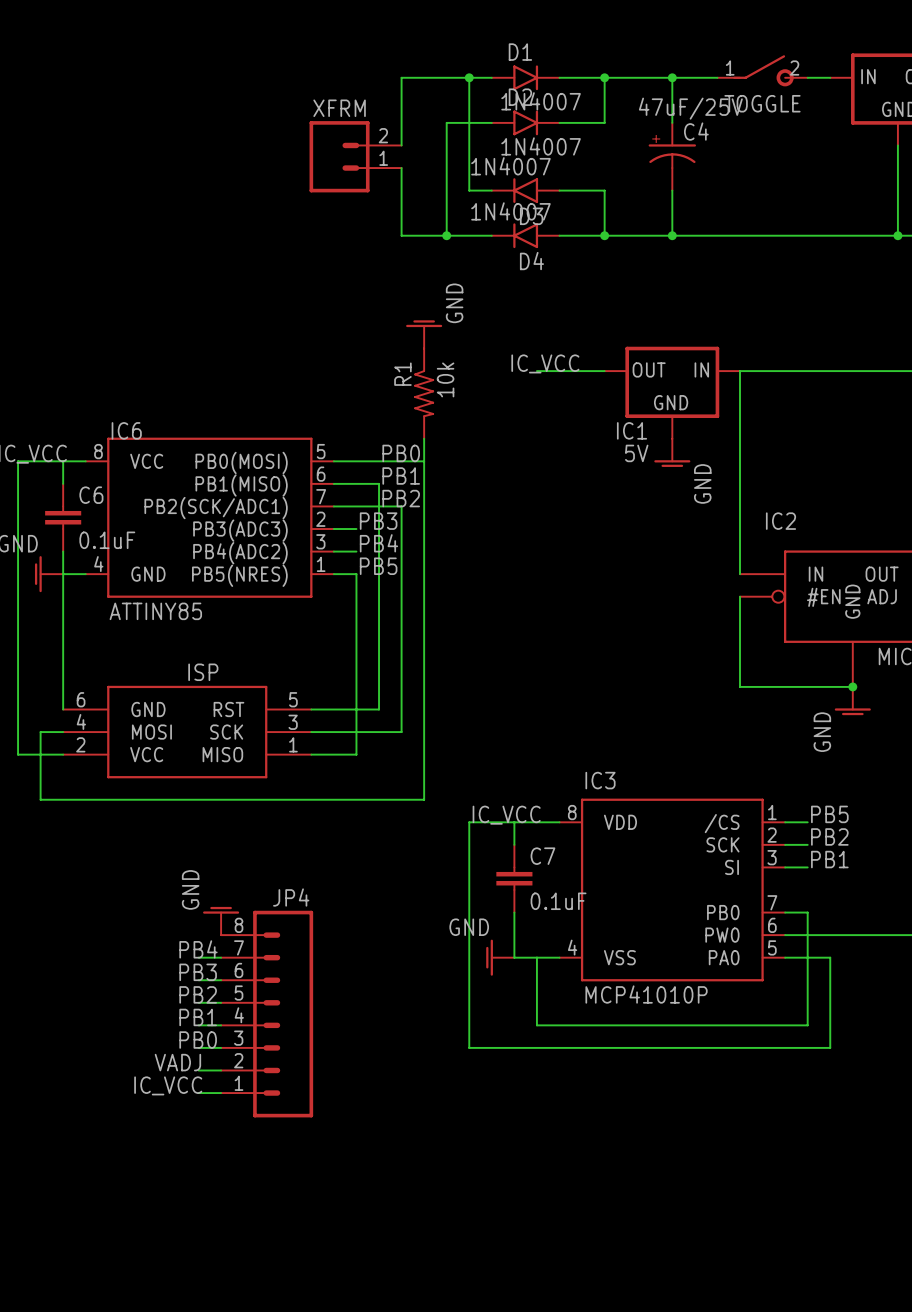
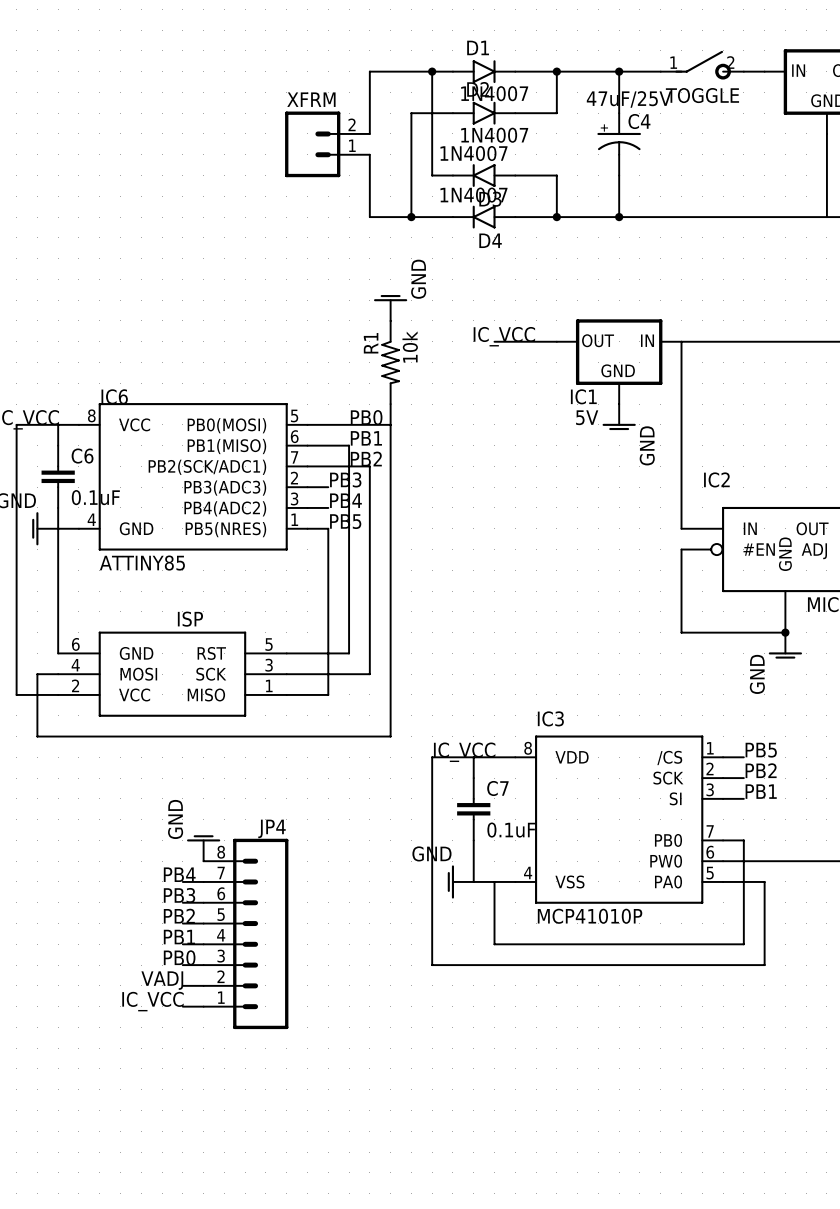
junction: (897, 235) -> none

